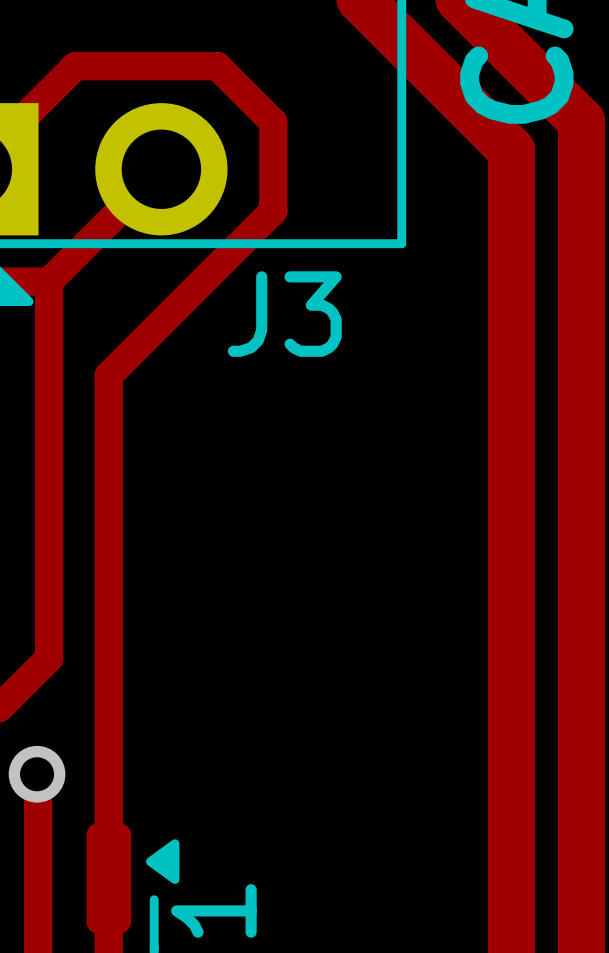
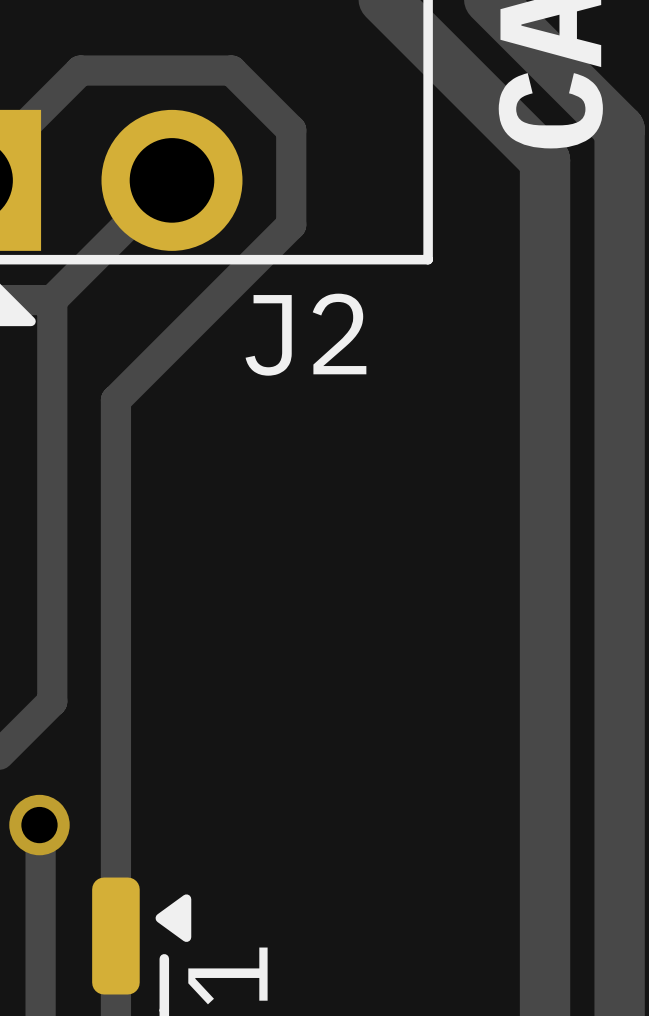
J3 name: J3 (284, 314) -> J2 (305, 334)

